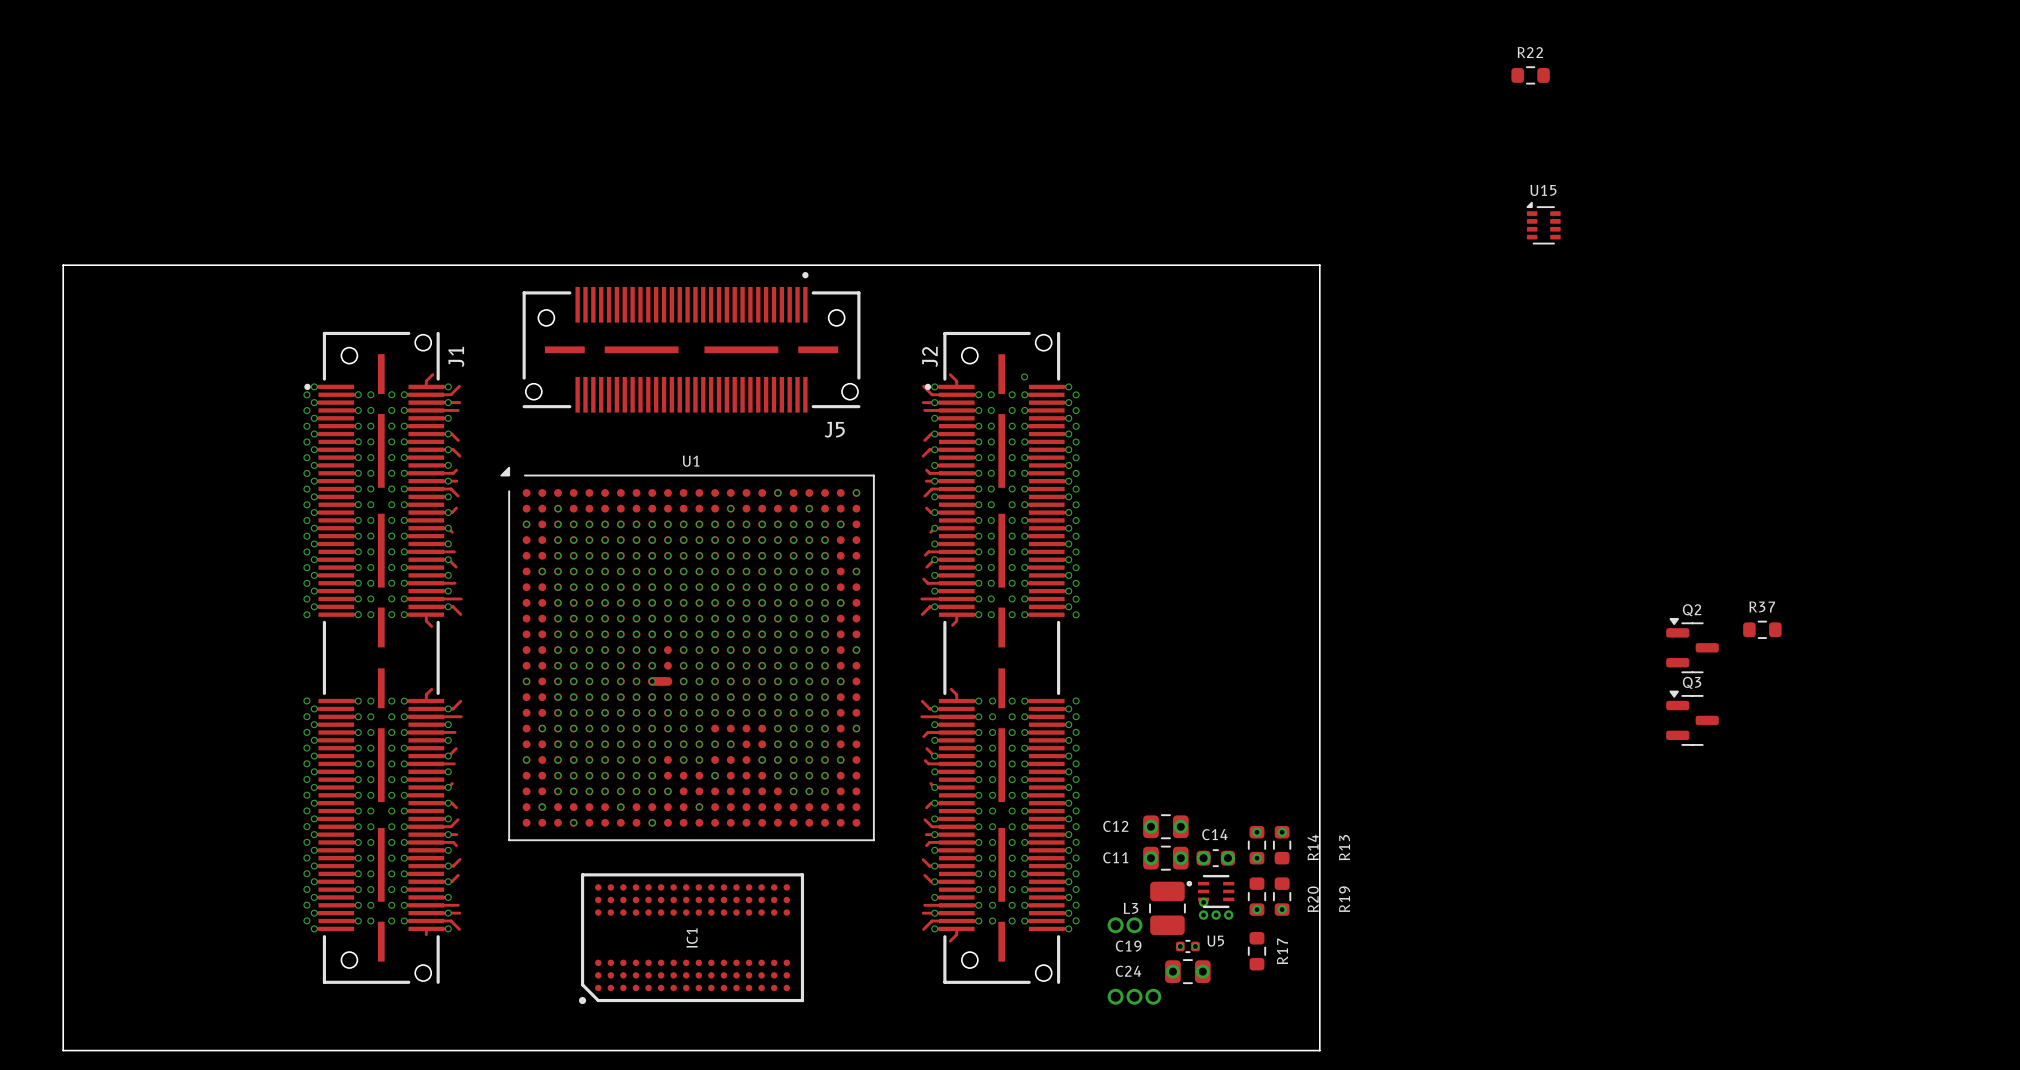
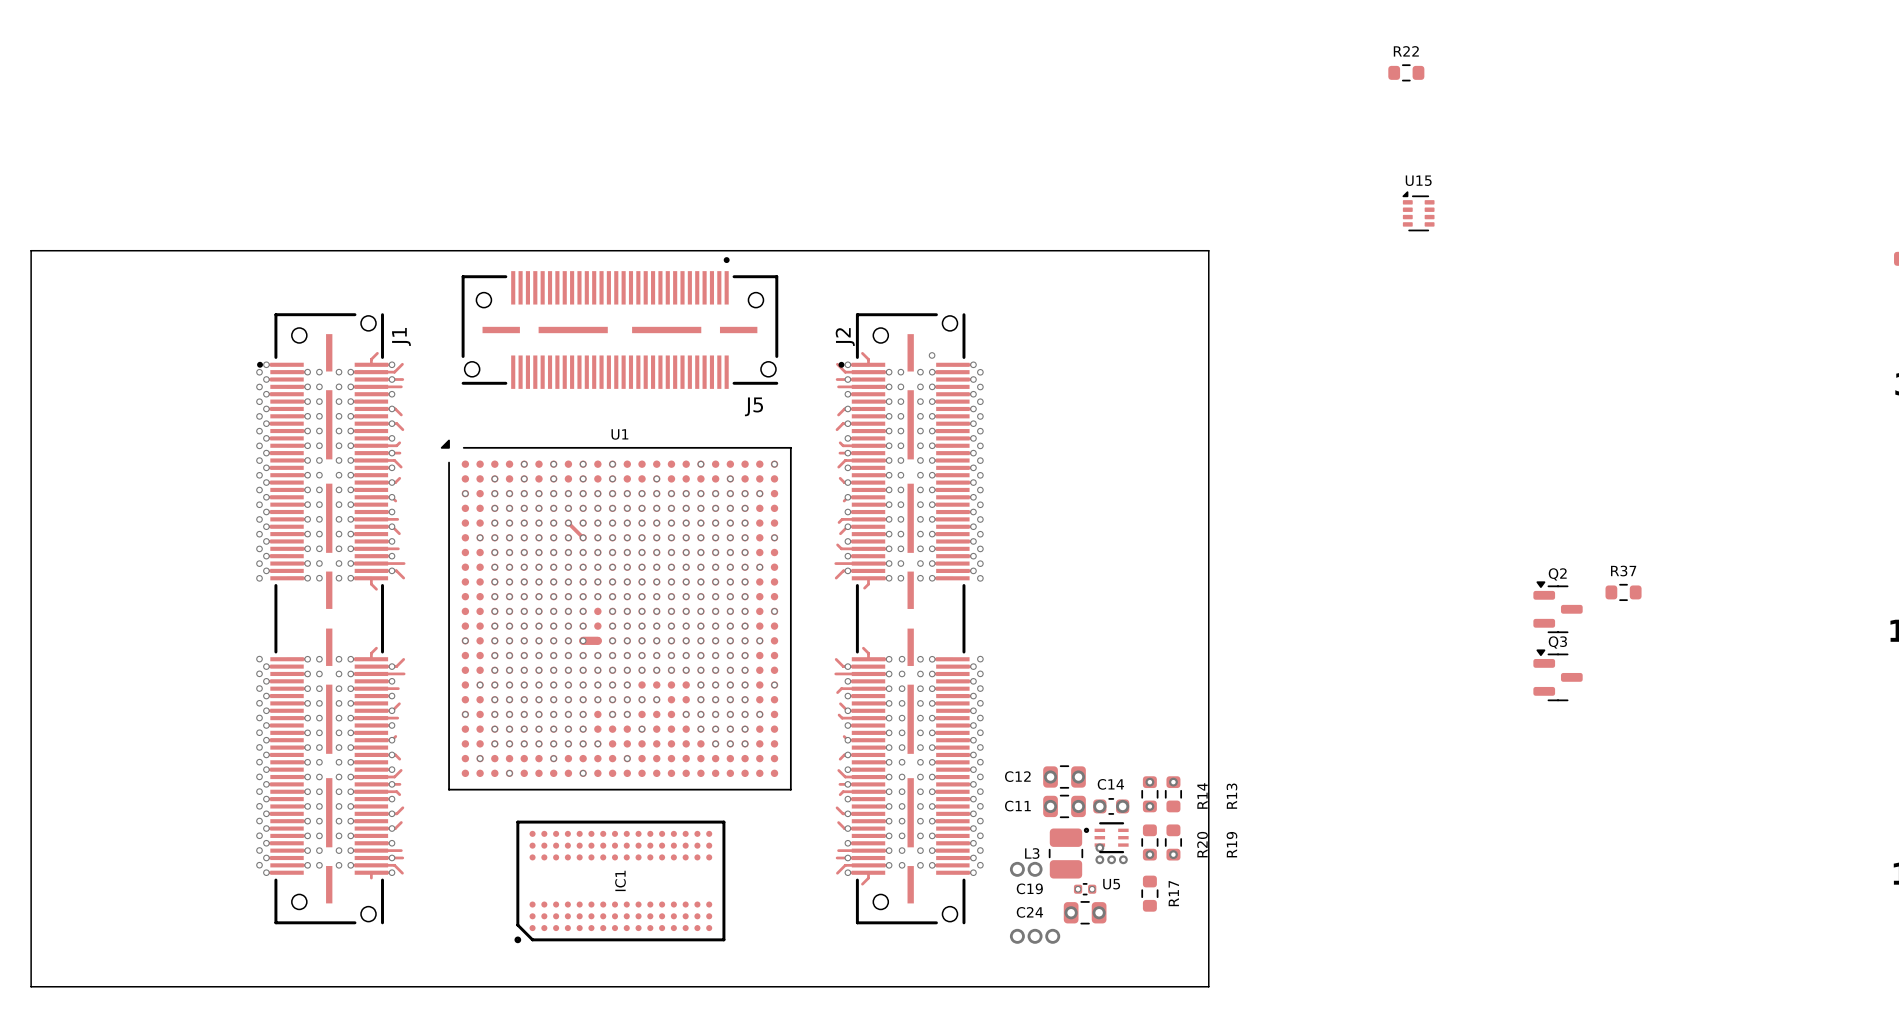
via: none -> (524, 464)
via: none -> (553, 464)
via: none -> (583, 464)
via: none -> (612, 464)
via: none -> (524, 478)
via: none -> (553, 478)
via: none -> (583, 478)
via: none -> (612, 478)
track: none -> (568, 523) (583, 537)

